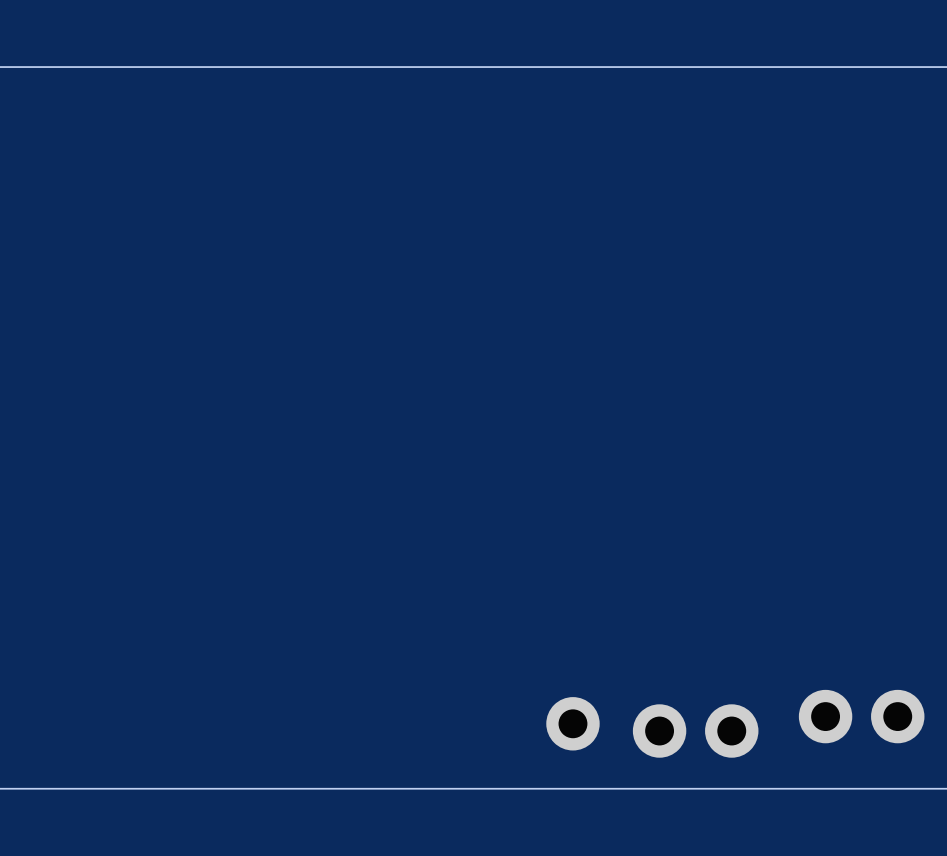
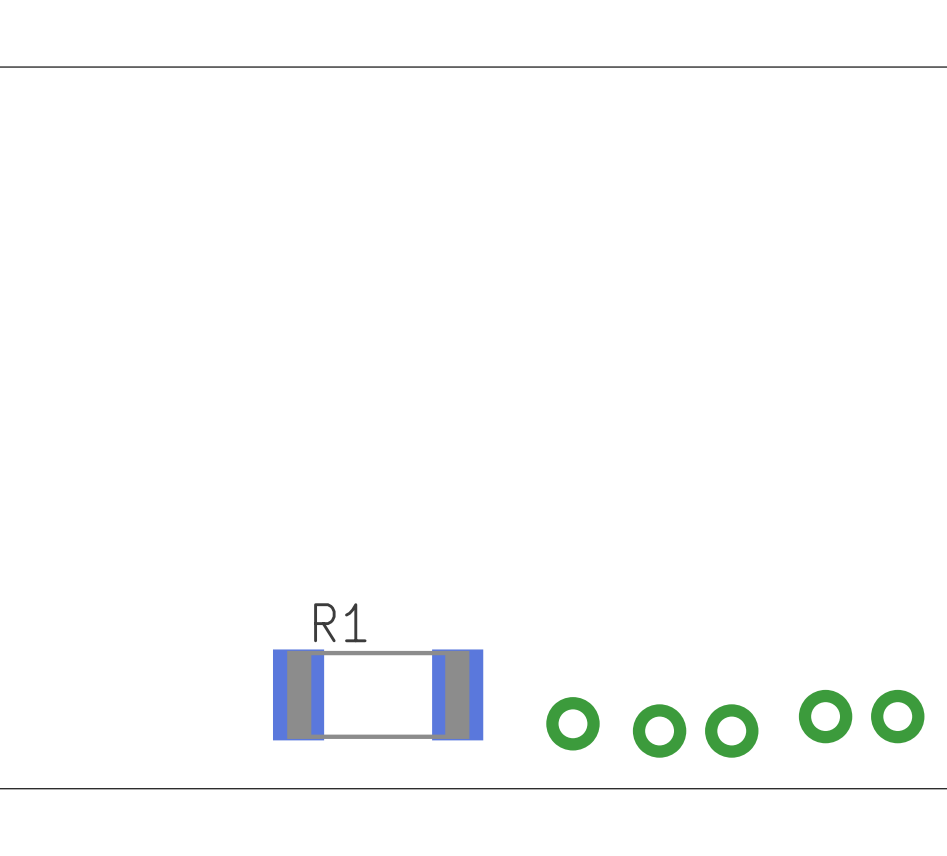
R1: none -> (378, 694)

